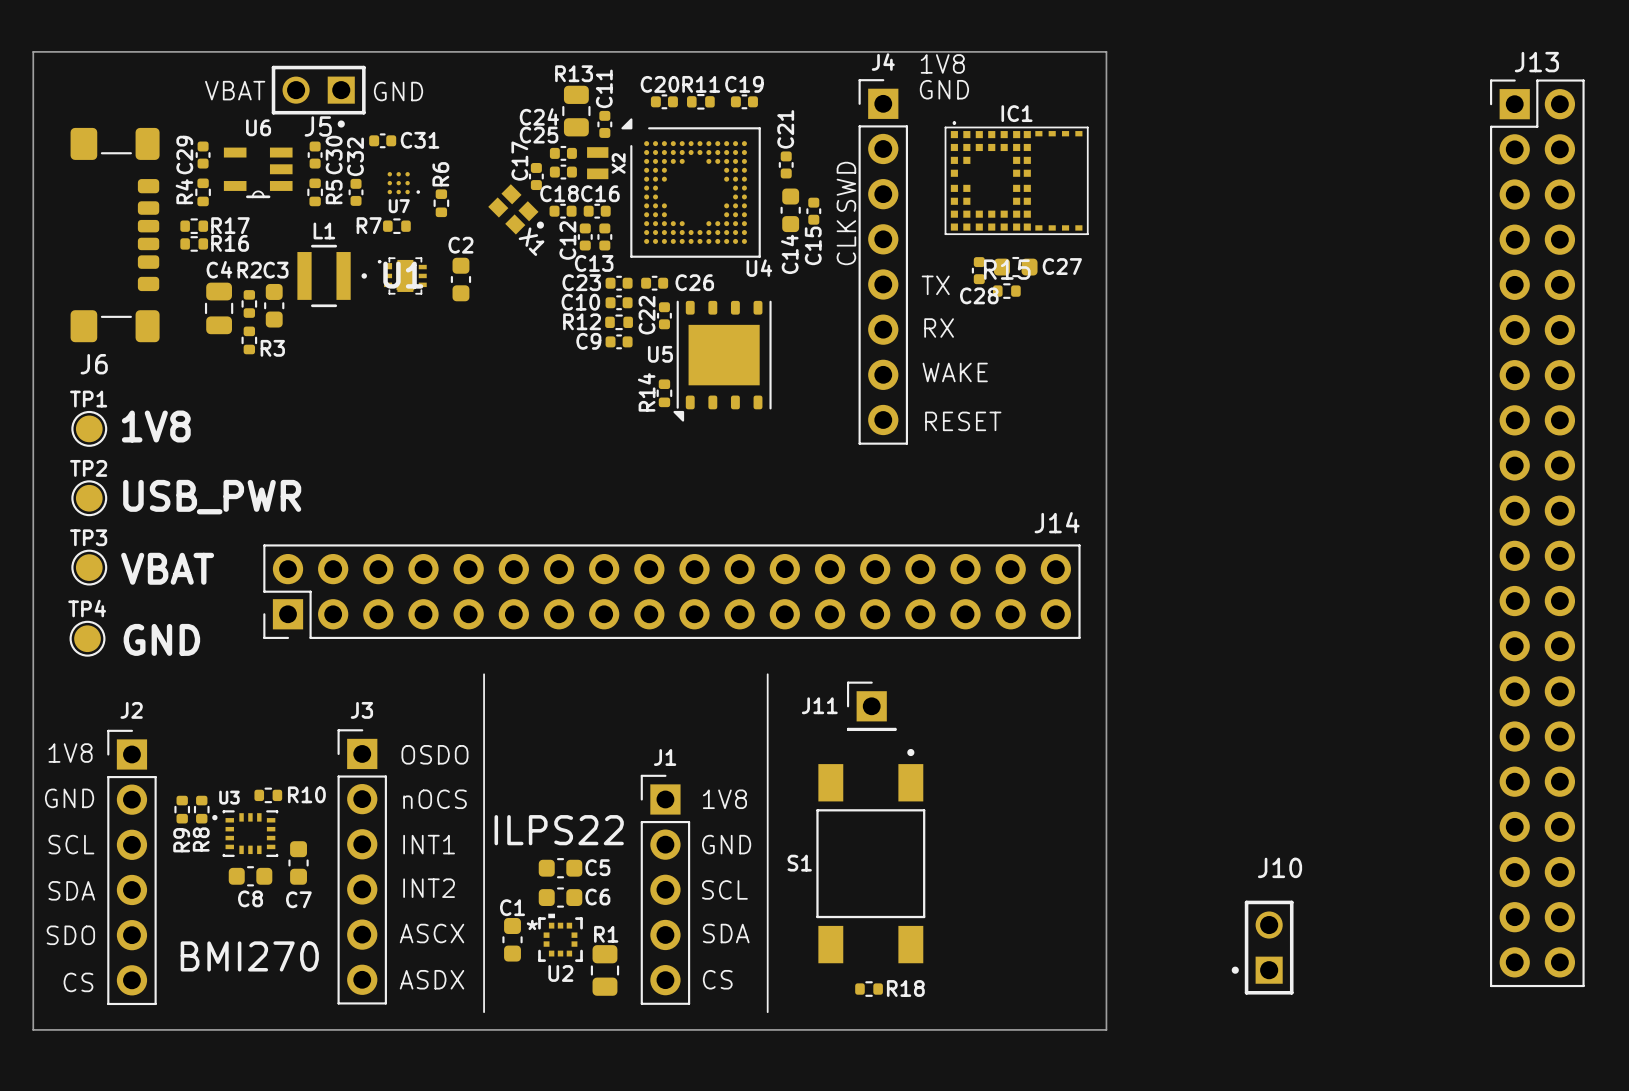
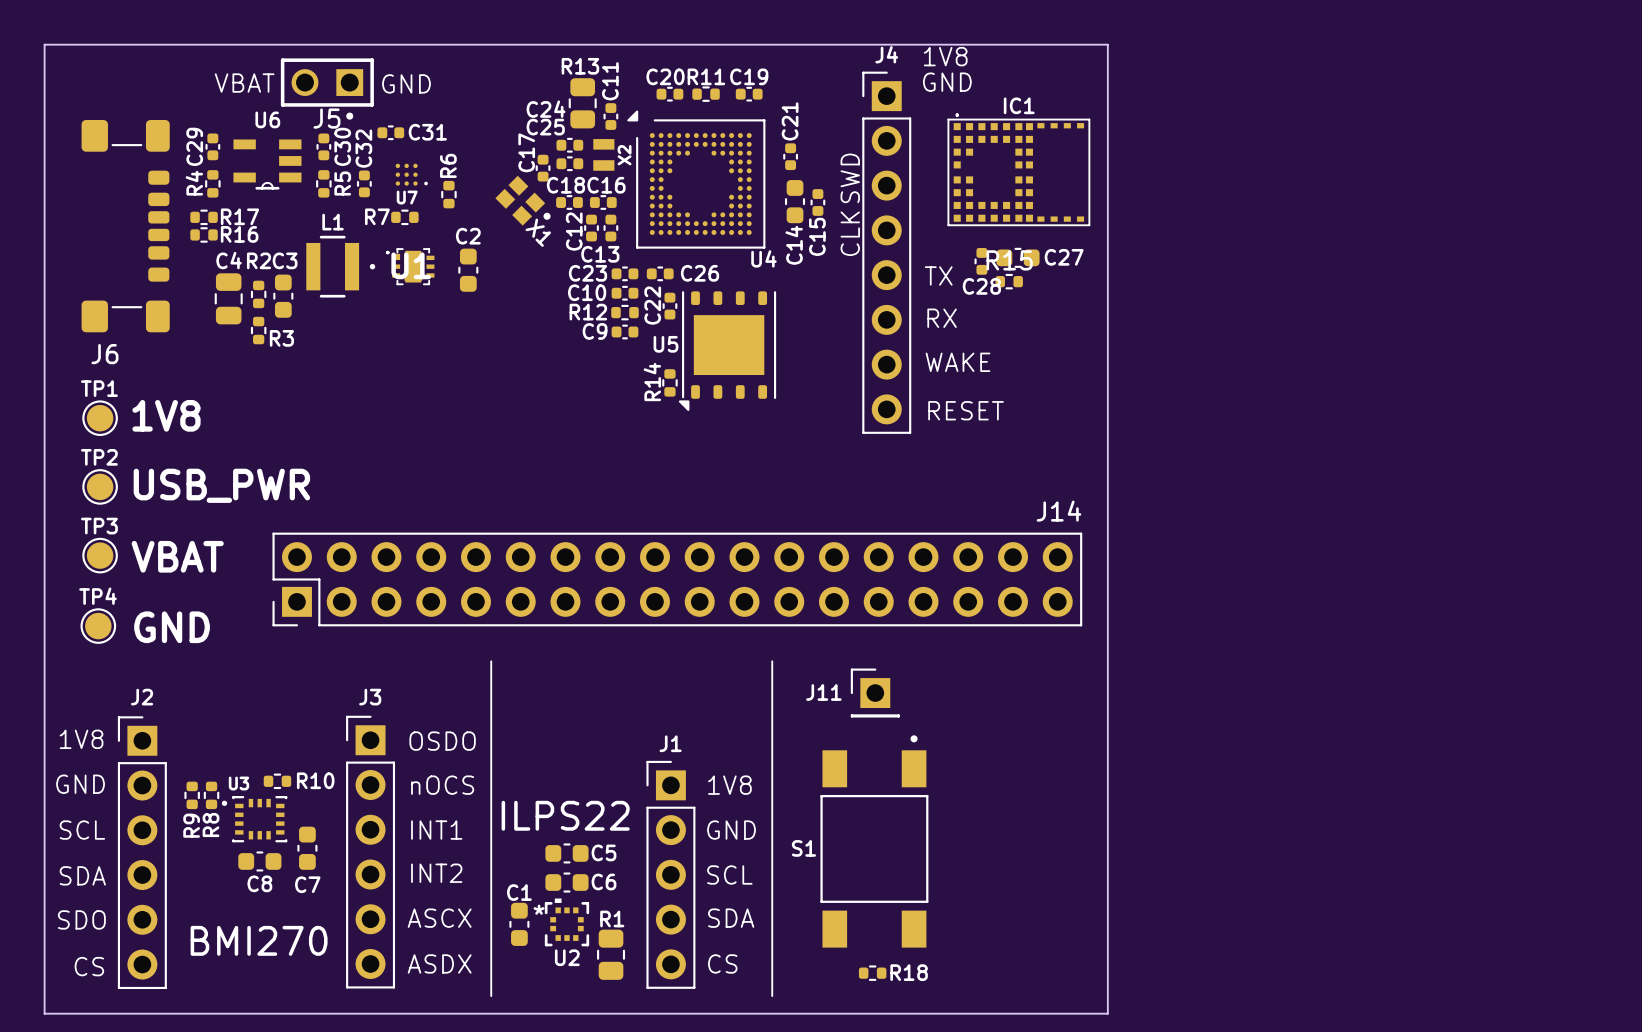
J13: (1537, 533) -> none
J10: (1262, 947) -> none

